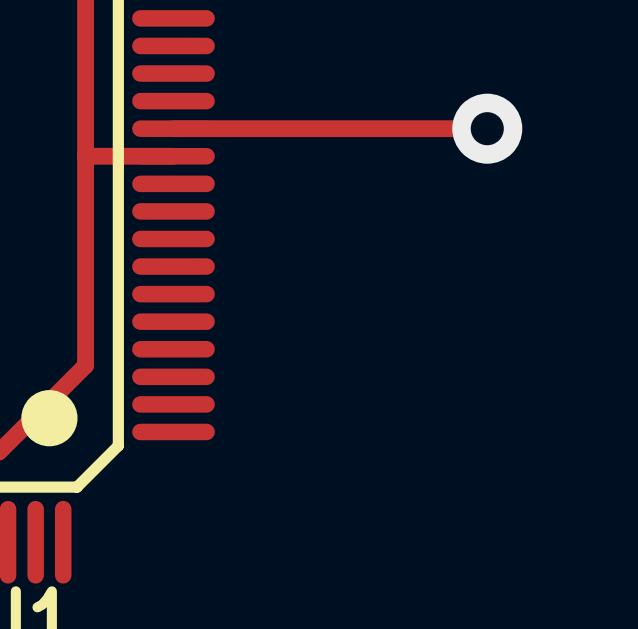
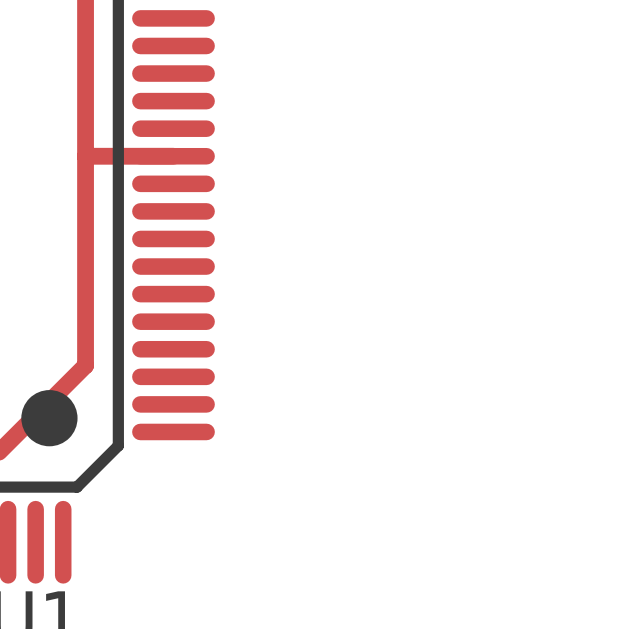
track: (173, 128) (487, 128) -> none
via: (487, 128) -> none

